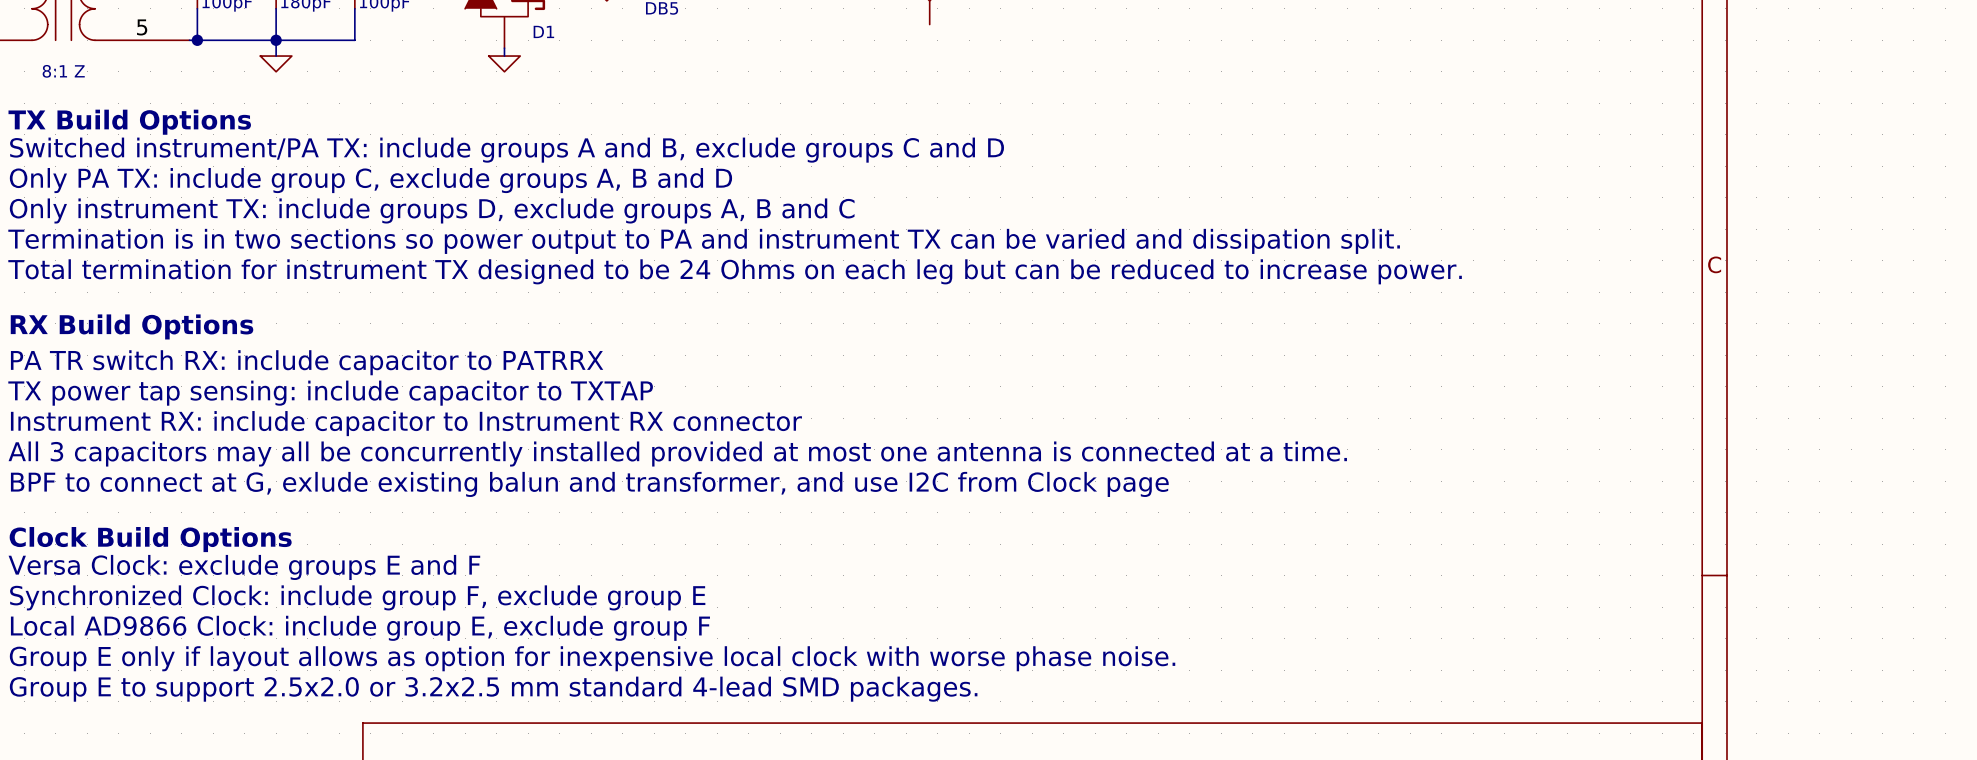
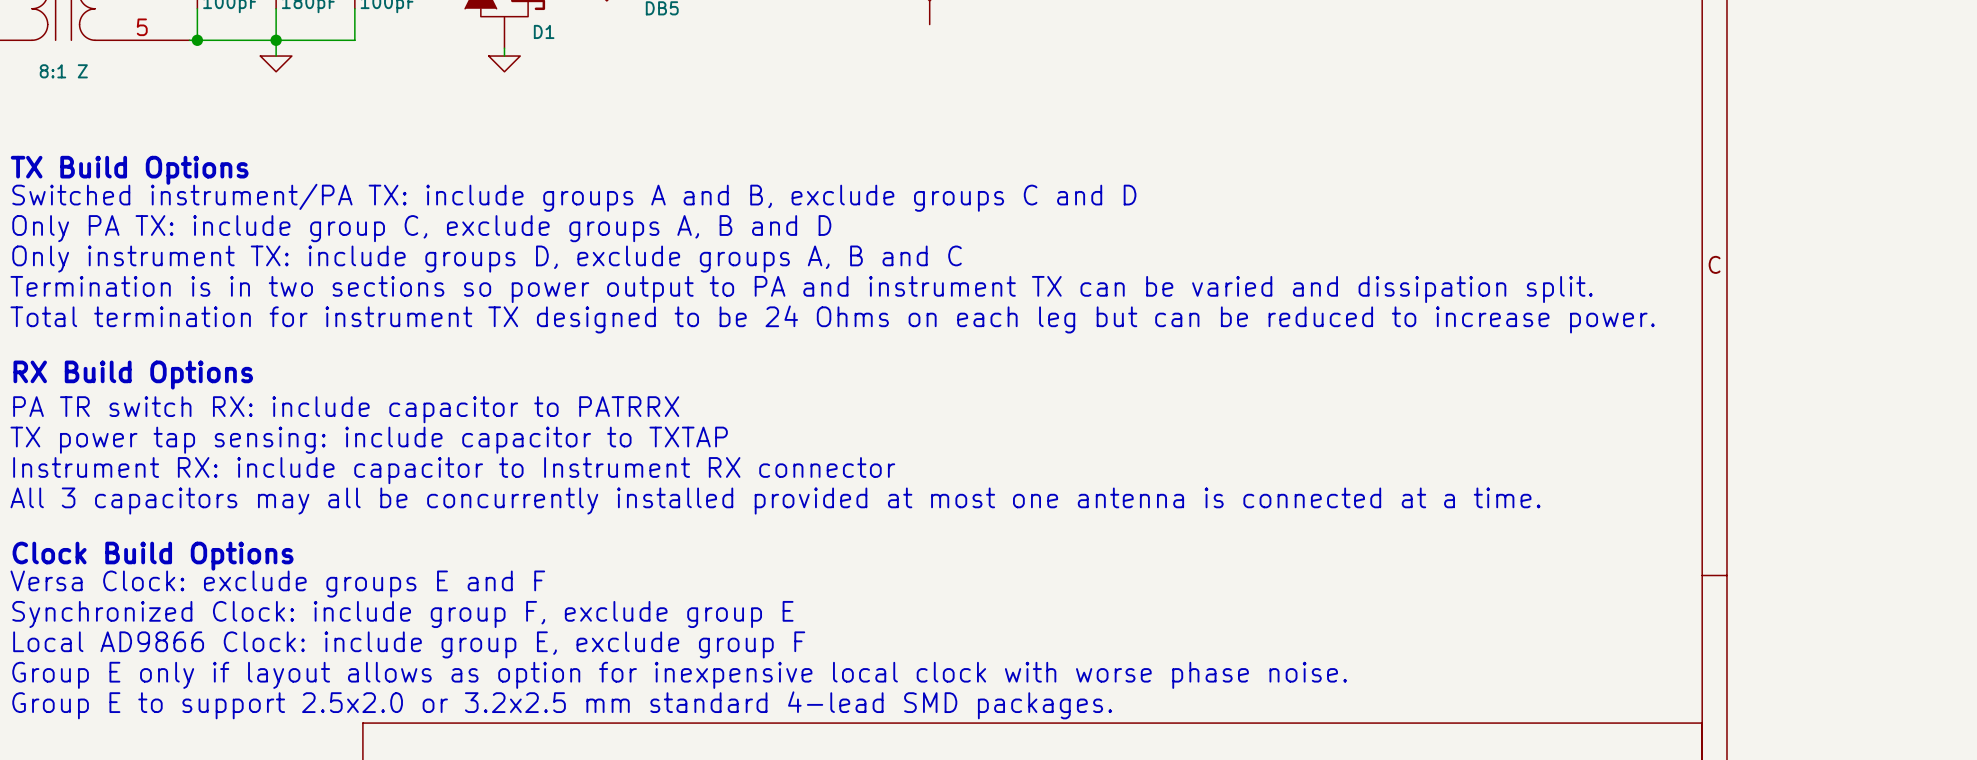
text position: TX Build Options (129, 122) -> TX Build Options (129, 170)
text position: Switched instrument/PA TX: include groups A and B, exclude groups C and D (507, 150) -> Switched instrument/PA TX: include groups A and B, exclude groups C and D (574, 197)
text position: Only PA TX: include group C, exclude groups A, B and D (370, 180) -> Only PA TX: include group C, exclude groups A, B and D (421, 228)
text position: Only instrument TX: include groups D, exclude groups A, B and C (432, 210) -> Only instrument TX: include groups D, exclude groups A, B and C (487, 259)
text position: Termination is in two sections so power output to PA and instrument TX can be varied and dissipation split. (704, 241) -> Termination is in two sections so power output to PA and instrument TX can be varied and dissipation split. (801, 289)
text position: Total termination for instrument TX designed to be 24 Ohms on each leg but can be reduced to increase power. (735, 271) -> Total termination for instrument TX designed to be 24 Ohms on each leg but can be reduced to increase power. (832, 319)
text position: RX Build Options (132, 326) -> RX Build Options (133, 375)
text position: PA TR switch RX: include capacitor to PATRRX (307, 362) -> PA TR switch RX: include capacitor to PATRRX (346, 409)
text position: TX power tap sensing: include capacitor to TXTAP (330, 393) -> TX power tap sensing: include capacitor to TXTAP (369, 440)
text position: Instrument RX: include capacitor to Instrument RX connector (406, 423) -> Instrument RX: include capacitor to Instrument RX connector (454, 470)
text position: All 3 capacitors may all be concurrently installed provided at most one antenna is connected at a time. (677, 454) -> All 3 capacitors may all be concurrently installed provided at most one antenna is connected at a time. (775, 501)
text: BPF to connect at G, exlude existing balun and transformer, and use I2C from Clock page (589, 484) -> none
text position: Clock Build Options (150, 539) -> Clock Build Options (153, 556)
text position: Versa Clock: exclude groups E and F (244, 567) -> Versa Clock: exclude groups E and F (277, 584)
text position: Synchronized Clock: include group F, exclude group E (357, 597) -> Synchronized Clock: include group F, exclude group E (402, 614)
text position: Local AD9866 Clock: include group E, exclude group F (360, 628) -> Local AD9866 Clock: include group E, exclude group F (409, 644)
text position: Group E only if layout allows as option for inexpensive local clock with worse phase noise. (592, 658) -> Group E only if layout allows as option for inexpensive local clock with worse phase noise. (679, 675)
text position: Group E to support 2.5x2.0 or 3.2x2.5 mm standard 4-lead SMD packages. (493, 689) -> Group E to support 2.5x2.0 or 3.2x2.5 mm standard 4-lead SMD packages. (562, 705)

